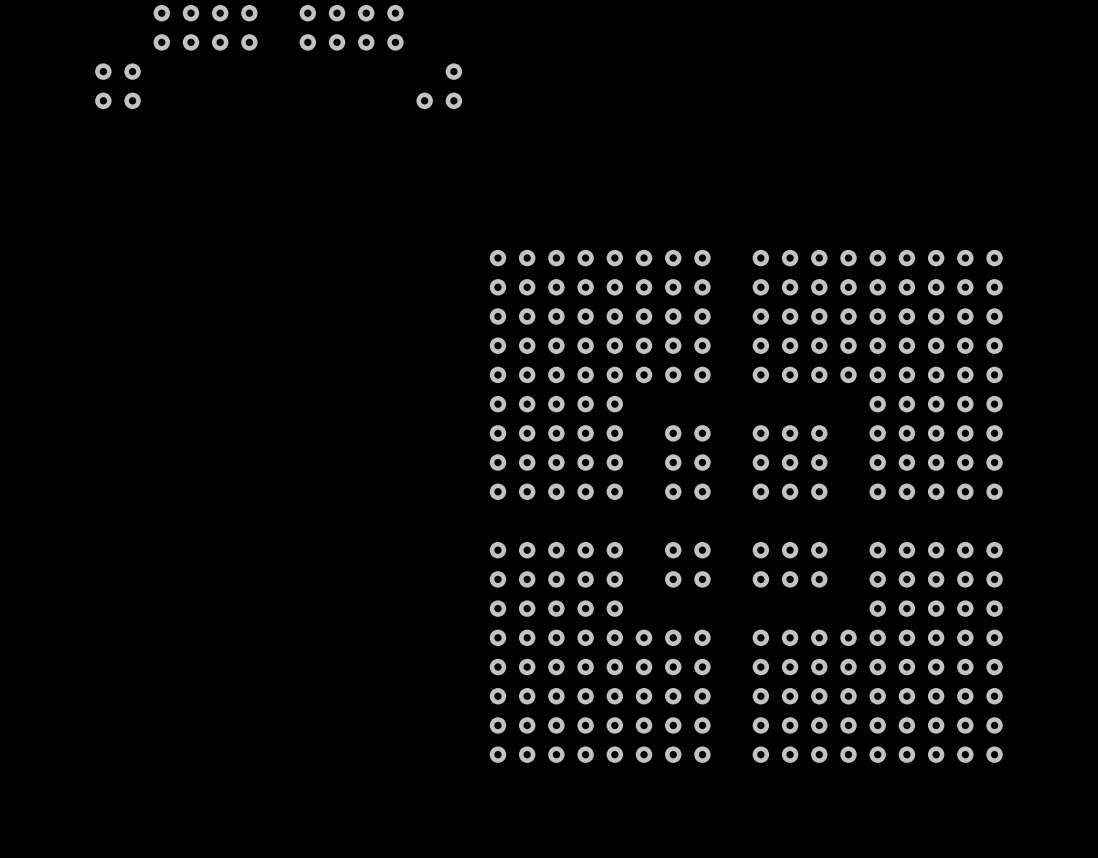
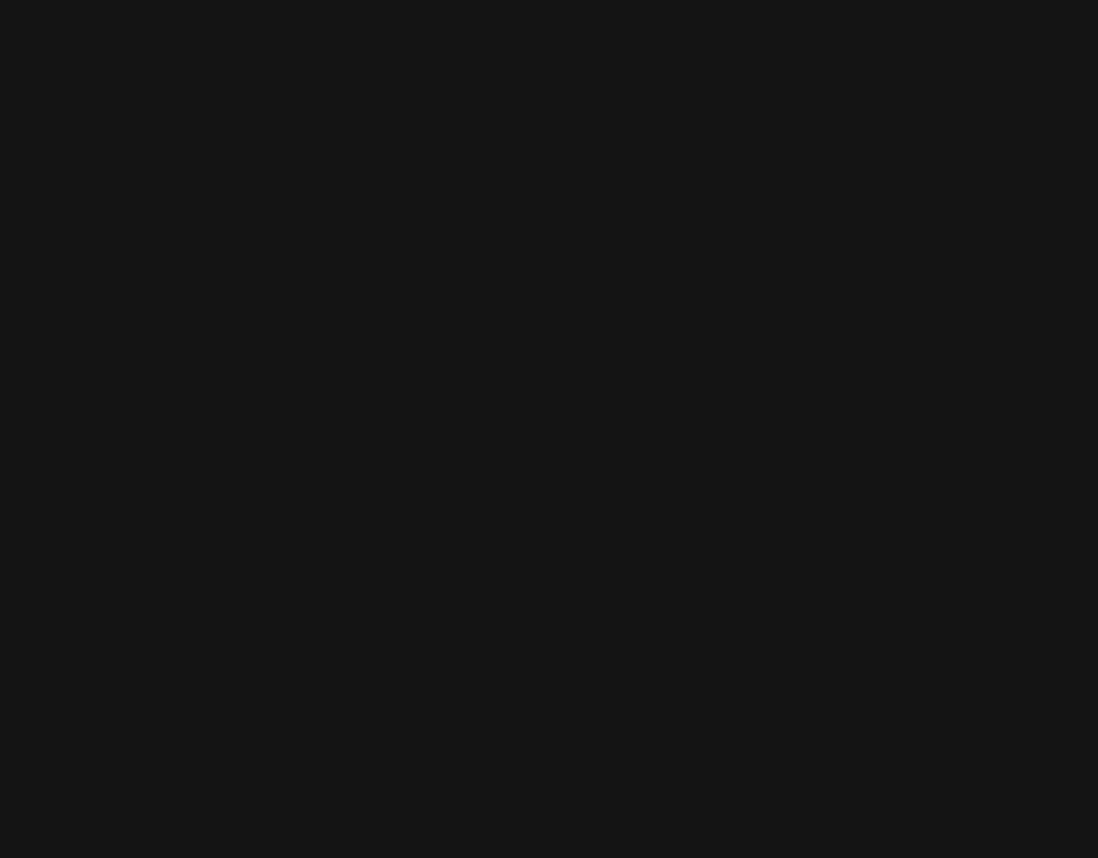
via: (161, 13) -> none
via: (190, 13) -> none
via: (220, 13) -> none
via: (249, 13) -> none
via: (307, 13) -> none
via: (337, 13) -> none
via: (366, 13) -> none
via: (395, 13) -> none
via: (161, 42) -> none
via: (190, 42) -> none
via: (220, 42) -> none
via: (249, 42) -> none
via: (307, 42) -> none
via: (337, 42) -> none
via: (366, 42) -> none
via: (395, 42) -> none
via: (103, 71) -> none
via: (132, 71) -> none
via: (453, 71) -> none
via: (103, 100) -> none
via: (132, 100) -> none
via: (424, 100) -> none
via: (453, 100) -> none
via: (497, 258) -> none
via: (527, 258) -> none
via: (556, 258) -> none
via: (585, 258) -> none
via: (614, 258) -> none
via: (644, 258) -> none
via: (673, 258) -> none
via: (702, 258) -> none
via: (760, 258) -> none
via: (790, 258) -> none
via: (819, 258) -> none
via: (848, 258) -> none
via: (877, 258) -> none
via: (906, 258) -> none
via: (936, 258) -> none
via: (965, 258) -> none
via: (994, 258) -> none
via: (497, 287) -> none
via: (527, 287) -> none
via: (556, 287) -> none
via: (585, 287) -> none
via: (614, 287) -> none
via: (644, 287) -> none
via: (673, 287) -> none
via: (702, 287) -> none
via: (760, 287) -> none
via: (790, 287) -> none
via: (819, 287) -> none
via: (848, 287) -> none
via: (877, 287) -> none
via: (906, 287) -> none
via: (936, 287) -> none
via: (965, 287) -> none
via: (994, 287) -> none
via: (497, 316) -> none
via: (527, 316) -> none
via: (556, 316) -> none
via: (585, 316) -> none
via: (614, 316) -> none
via: (644, 316) -> none
via: (673, 316) -> none
via: (702, 316) -> none
via: (760, 316) -> none
via: (790, 316) -> none
via: (819, 316) -> none
via: (848, 316) -> none
via: (877, 316) -> none
via: (906, 316) -> none
via: (936, 316) -> none
via: (965, 316) -> none
via: (994, 316) -> none
via: (497, 345) -> none
via: (527, 345) -> none
via: (556, 345) -> none
via: (585, 345) -> none
via: (614, 345) -> none
via: (644, 345) -> none
via: (673, 345) -> none
via: (702, 345) -> none
via: (760, 345) -> none
via: (790, 345) -> none
via: (819, 345) -> none
via: (848, 345) -> none
via: (877, 345) -> none
via: (906, 345) -> none
via: (936, 345) -> none
via: (965, 345) -> none
via: (994, 345) -> none
via: (497, 374) -> none
via: (527, 374) -> none
via: (556, 374) -> none
via: (585, 374) -> none
via: (614, 374) -> none
via: (644, 374) -> none
via: (673, 374) -> none
via: (702, 374) -> none
via: (760, 374) -> none
via: (790, 374) -> none
via: (819, 374) -> none
via: (848, 374) -> none
via: (877, 374) -> none
via: (906, 374) -> none
via: (936, 374) -> none
via: (965, 374) -> none
via: (994, 374) -> none
via: (497, 404) -> none
via: (527, 404) -> none
via: (556, 404) -> none
via: (585, 404) -> none
via: (614, 404) -> none
via: (877, 404) -> none
via: (906, 404) -> none
via: (936, 404) -> none
via: (965, 404) -> none
via: (994, 404) -> none
via: (497, 433) -> none
via: (527, 433) -> none
via: (556, 433) -> none
via: (585, 433) -> none
via: (614, 433) -> none
via: (673, 433) -> none
via: (702, 433) -> none
via: (760, 433) -> none
via: (790, 433) -> none
via: (819, 433) -> none
via: (877, 433) -> none
via: (906, 433) -> none
via: (936, 433) -> none
via: (965, 433) -> none
via: (994, 433) -> none
via: (497, 462) -> none
via: (527, 462) -> none
via: (556, 462) -> none
via: (585, 462) -> none
via: (614, 462) -> none
via: (673, 462) -> none
via: (702, 462) -> none
via: (760, 462) -> none
via: (790, 462) -> none
via: (819, 462) -> none
via: (877, 462) -> none
via: (906, 462) -> none
via: (936, 462) -> none
via: (965, 462) -> none
via: (994, 462) -> none
via: (497, 491) -> none
via: (527, 491) -> none
via: (556, 491) -> none
via: (585, 491) -> none
via: (614, 491) -> none
via: (673, 491) -> none
via: (702, 491) -> none
via: (760, 491) -> none
via: (790, 491) -> none
via: (819, 491) -> none
via: (877, 491) -> none
via: (906, 491) -> none
via: (936, 491) -> none
via: (965, 491) -> none
via: (994, 491) -> none
via: (497, 550) -> none
via: (527, 550) -> none
via: (556, 550) -> none
via: (585, 550) -> none
via: (614, 550) -> none
via: (673, 550) -> none
via: (702, 550) -> none
via: (760, 550) -> none
via: (790, 550) -> none
via: (819, 550) -> none
via: (877, 550) -> none
via: (906, 550) -> none
via: (936, 550) -> none
via: (965, 550) -> none
via: (994, 550) -> none
via: (497, 579) -> none
via: (527, 579) -> none
via: (556, 579) -> none
via: (585, 579) -> none
via: (614, 579) -> none
via: (673, 579) -> none
via: (702, 579) -> none
via: (760, 579) -> none
via: (790, 579) -> none
via: (819, 579) -> none
via: (877, 579) -> none
via: (906, 579) -> none
via: (936, 579) -> none
via: (965, 579) -> none
via: (994, 579) -> none
via: (497, 608) -> none
via: (527, 608) -> none
via: (556, 608) -> none
via: (585, 608) -> none
via: (614, 608) -> none
via: (877, 608) -> none
via: (906, 608) -> none
via: (936, 608) -> none
via: (965, 608) -> none
via: (994, 608) -> none
via: (497, 637) -> none
via: (527, 637) -> none
via: (556, 637) -> none
via: (585, 637) -> none
via: (614, 637) -> none
via: (644, 637) -> none
via: (673, 637) -> none
via: (702, 637) -> none
via: (760, 637) -> none
via: (790, 637) -> none
via: (819, 637) -> none
via: (848, 637) -> none
via: (877, 637) -> none
via: (906, 637) -> none
via: (936, 637) -> none
via: (965, 637) -> none
via: (994, 637) -> none
via: (497, 667) -> none
via: (527, 667) -> none
via: (556, 667) -> none
via: (585, 667) -> none
via: (614, 667) -> none
via: (644, 667) -> none
via: (673, 667) -> none
via: (702, 667) -> none
via: (760, 667) -> none
via: (790, 667) -> none
via: (819, 667) -> none
via: (848, 667) -> none
via: (877, 667) -> none
via: (906, 667) -> none
via: (936, 667) -> none
via: (965, 667) -> none
via: (994, 667) -> none
via: (497, 696) -> none
via: (527, 696) -> none
via: (556, 696) -> none
via: (585, 696) -> none
via: (614, 696) -> none
via: (644, 696) -> none
via: (673, 696) -> none
via: (702, 696) -> none
via: (760, 696) -> none
via: (790, 696) -> none
via: (819, 696) -> none
via: (848, 696) -> none
via: (877, 696) -> none
via: (906, 696) -> none
via: (936, 696) -> none
via: (965, 696) -> none
via: (994, 696) -> none
via: (497, 725) -> none
via: (527, 725) -> none
via: (556, 725) -> none
via: (585, 725) -> none
via: (614, 725) -> none
via: (644, 725) -> none
via: (673, 725) -> none
via: (702, 725) -> none
via: (760, 725) -> none
via: (790, 725) -> none
via: (819, 725) -> none
via: (848, 725) -> none
via: (877, 725) -> none
via: (906, 725) -> none
via: (936, 725) -> none
via: (965, 725) -> none
via: (994, 725) -> none
via: (497, 754) -> none
via: (527, 754) -> none
via: (556, 754) -> none
via: (585, 754) -> none
via: (614, 754) -> none
via: (644, 754) -> none
via: (673, 754) -> none
via: (702, 754) -> none
via: (760, 754) -> none
via: (790, 754) -> none
via: (819, 754) -> none
via: (848, 754) -> none
via: (877, 754) -> none
via: (906, 754) -> none
via: (936, 754) -> none
via: (965, 754) -> none
via: (994, 754) -> none

